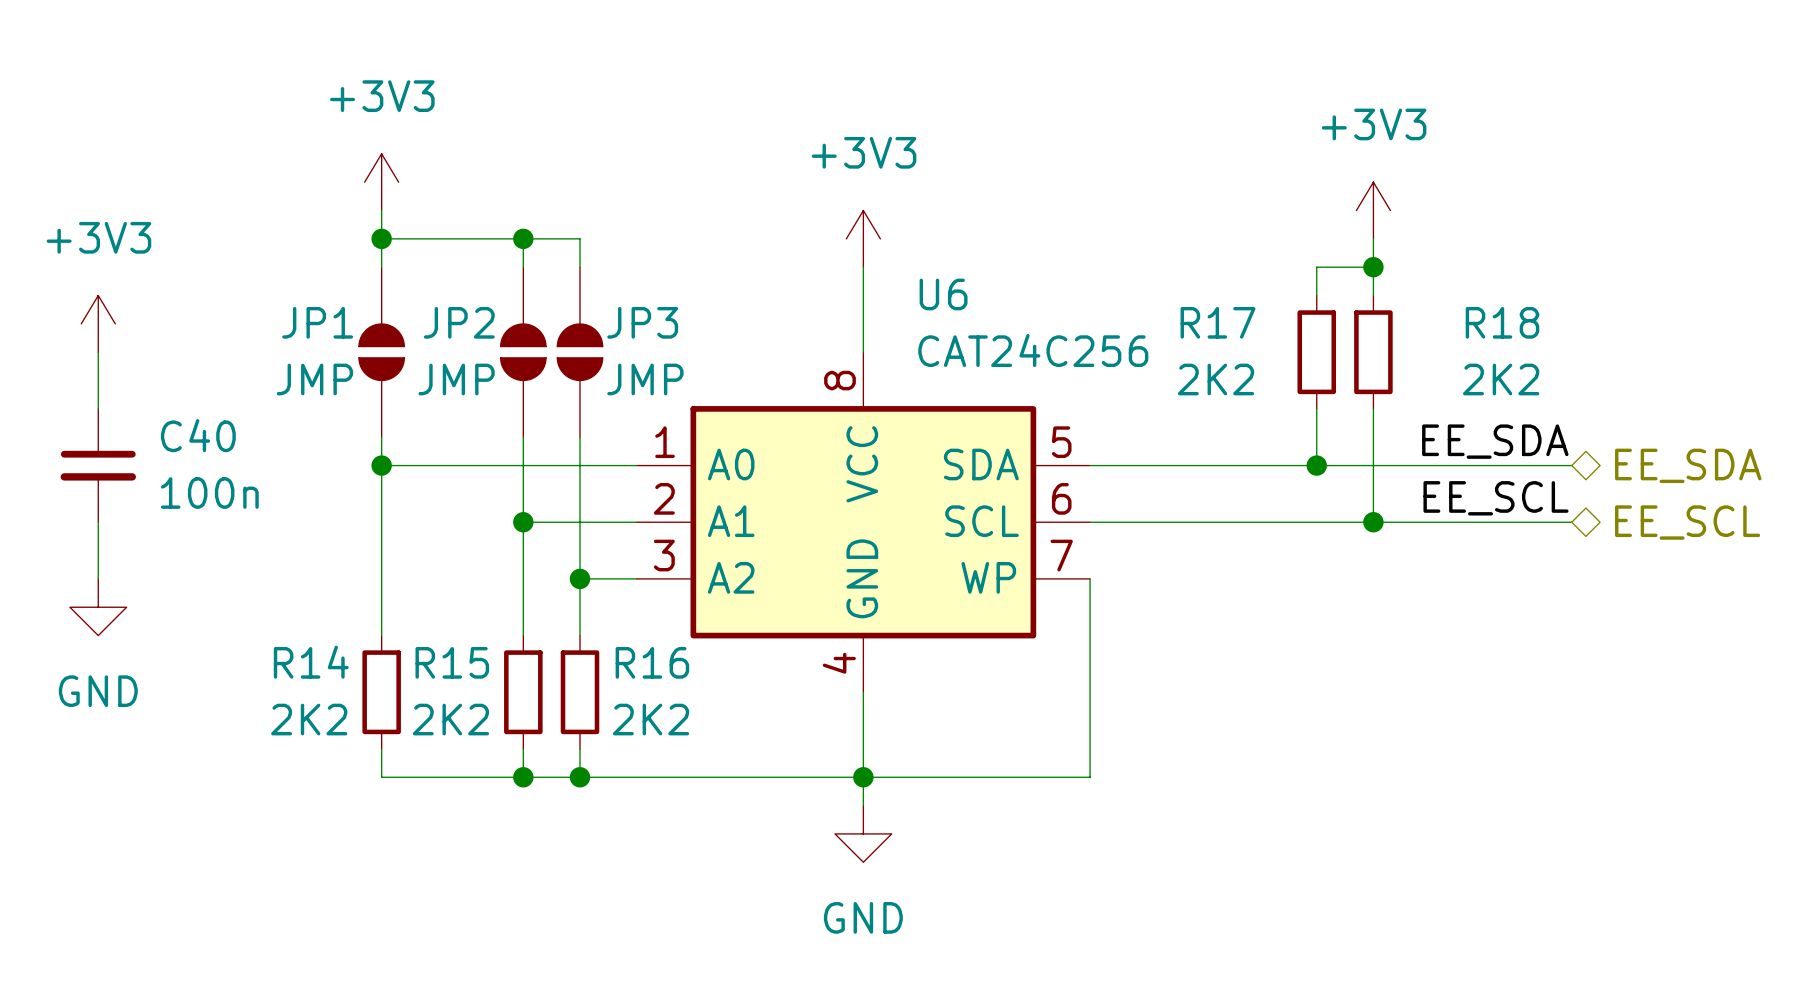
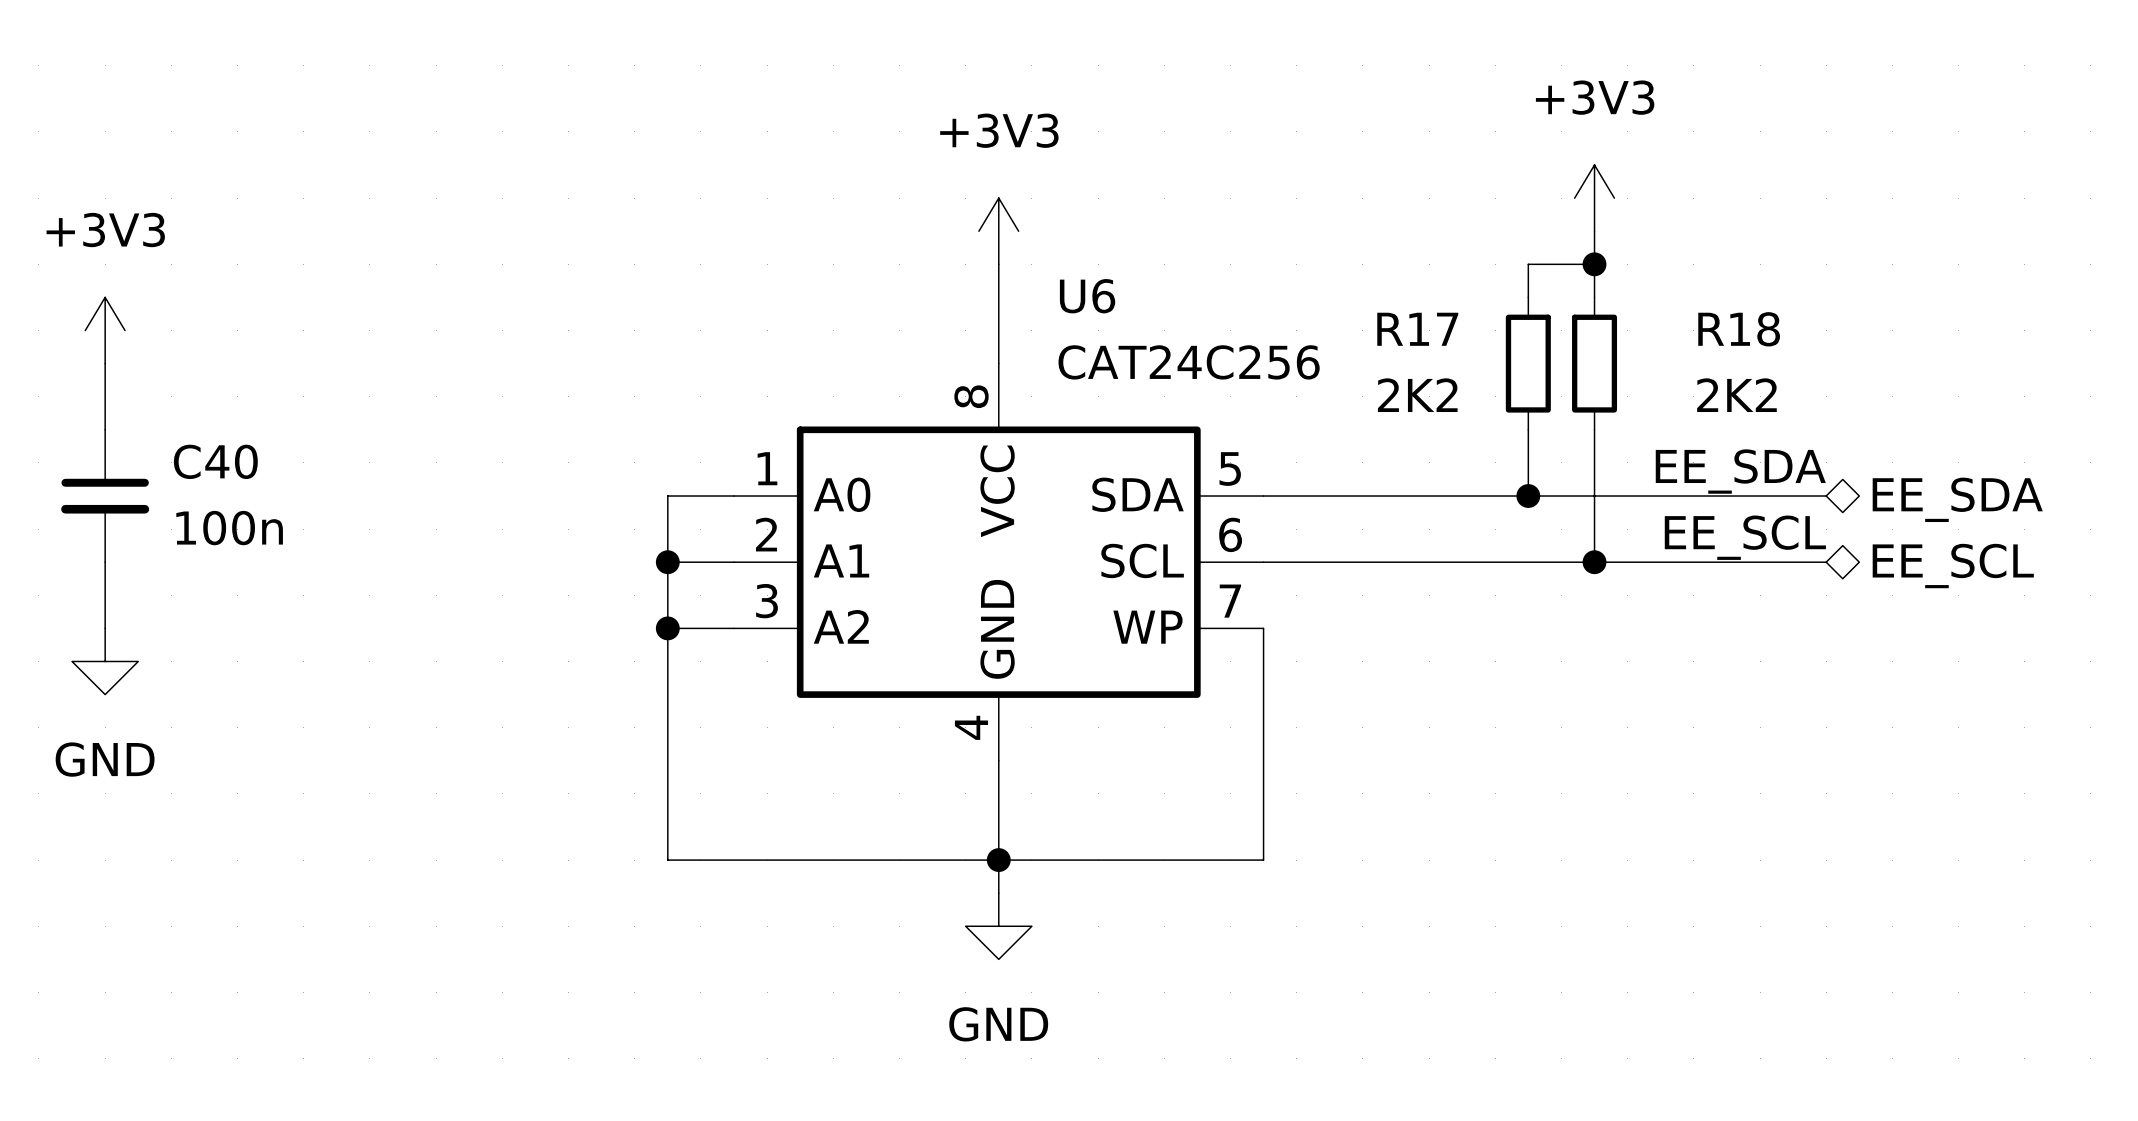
power symbol: +3V3 (381, 182) -> none
wire: (381, 210) (381, 267) -> none
wire: (381, 238) (580, 238) (580, 267) -> none
junction: (381, 238) -> none
wire: (523, 238) (523, 267) -> none
junction: (523, 238) -> none
JP1: JMP (381, 352) -> none
JP2: JMP (523, 352) -> none
JP3: JMP (580, 352) -> none
wire: (381, 437) (381, 635) -> none
wire: (523, 437) (523, 635) -> none
wire: (580, 437) (580, 465) (381, 465) -> none
junction: (381, 465) -> none
wire: (523, 522) (580, 522) -> none
junction position: (523, 522) -> (667, 562)
wire: none -> (667, 694) (667, 826)
R14: 2K2 (381, 692) -> none
R15: 2K2 (523, 692) -> none
R16: 2K2 (580, 692) -> none
wire: (381, 748) (381, 777) (580, 777) -> none
wire: (523, 748) (523, 777) -> none
junction: (523, 777) -> none
junction: (580, 777) -> none

